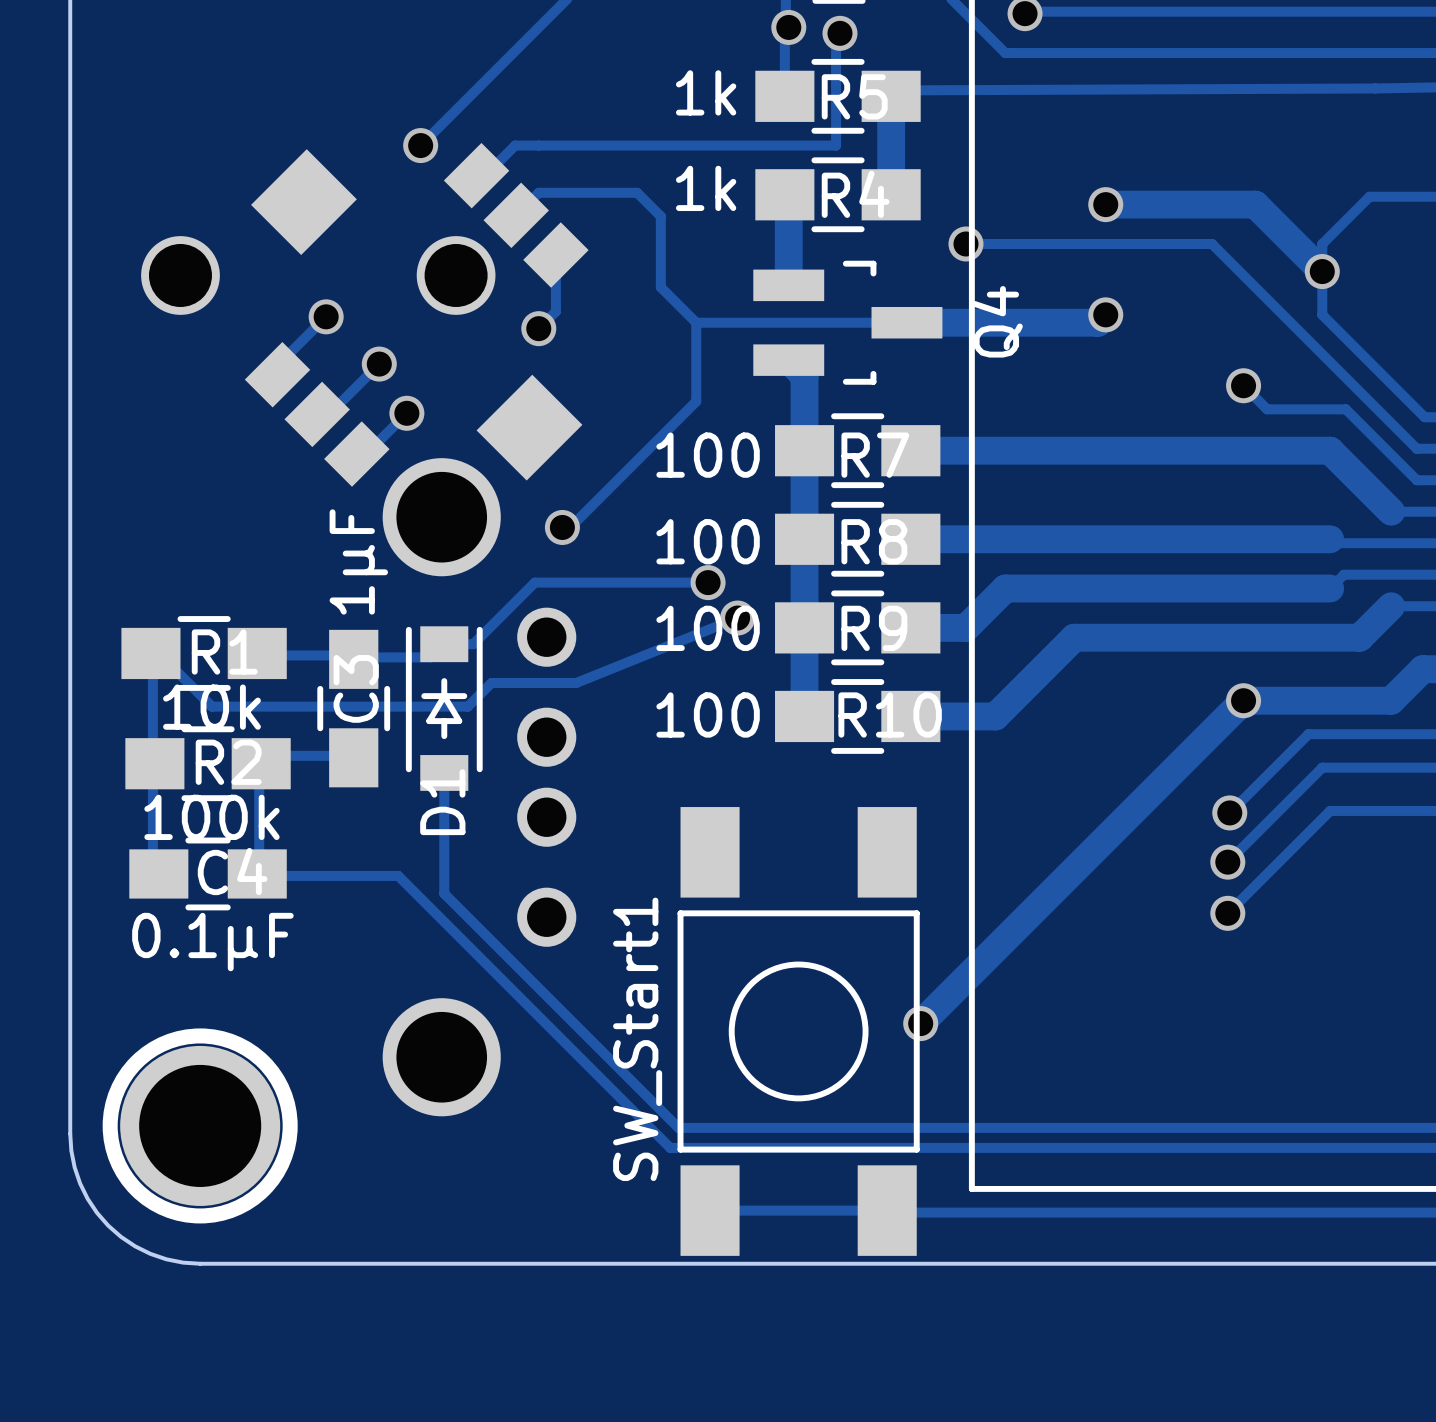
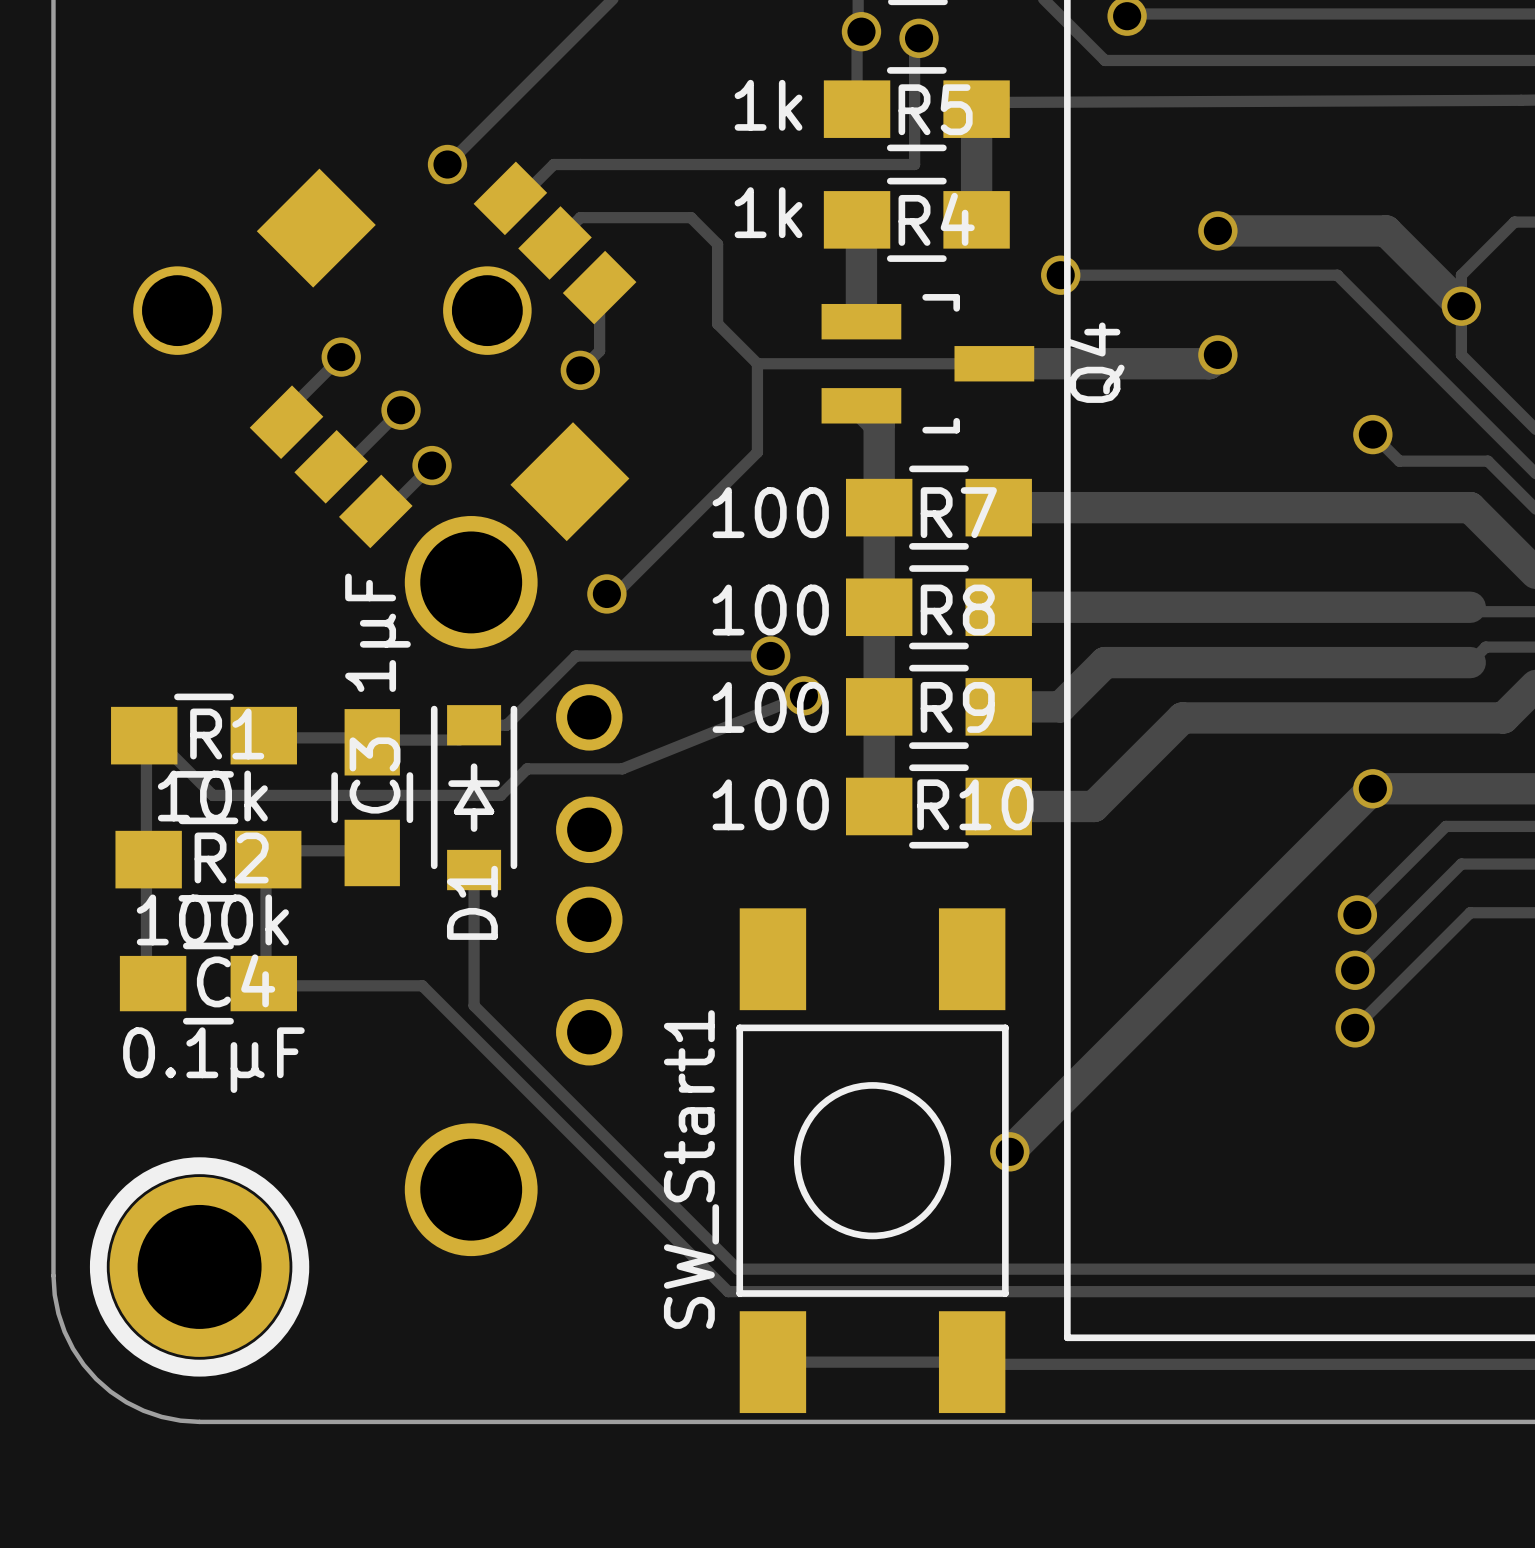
part footprint: [102, 1028, 298, 1224] -> [89, 1157, 310, 1377]

